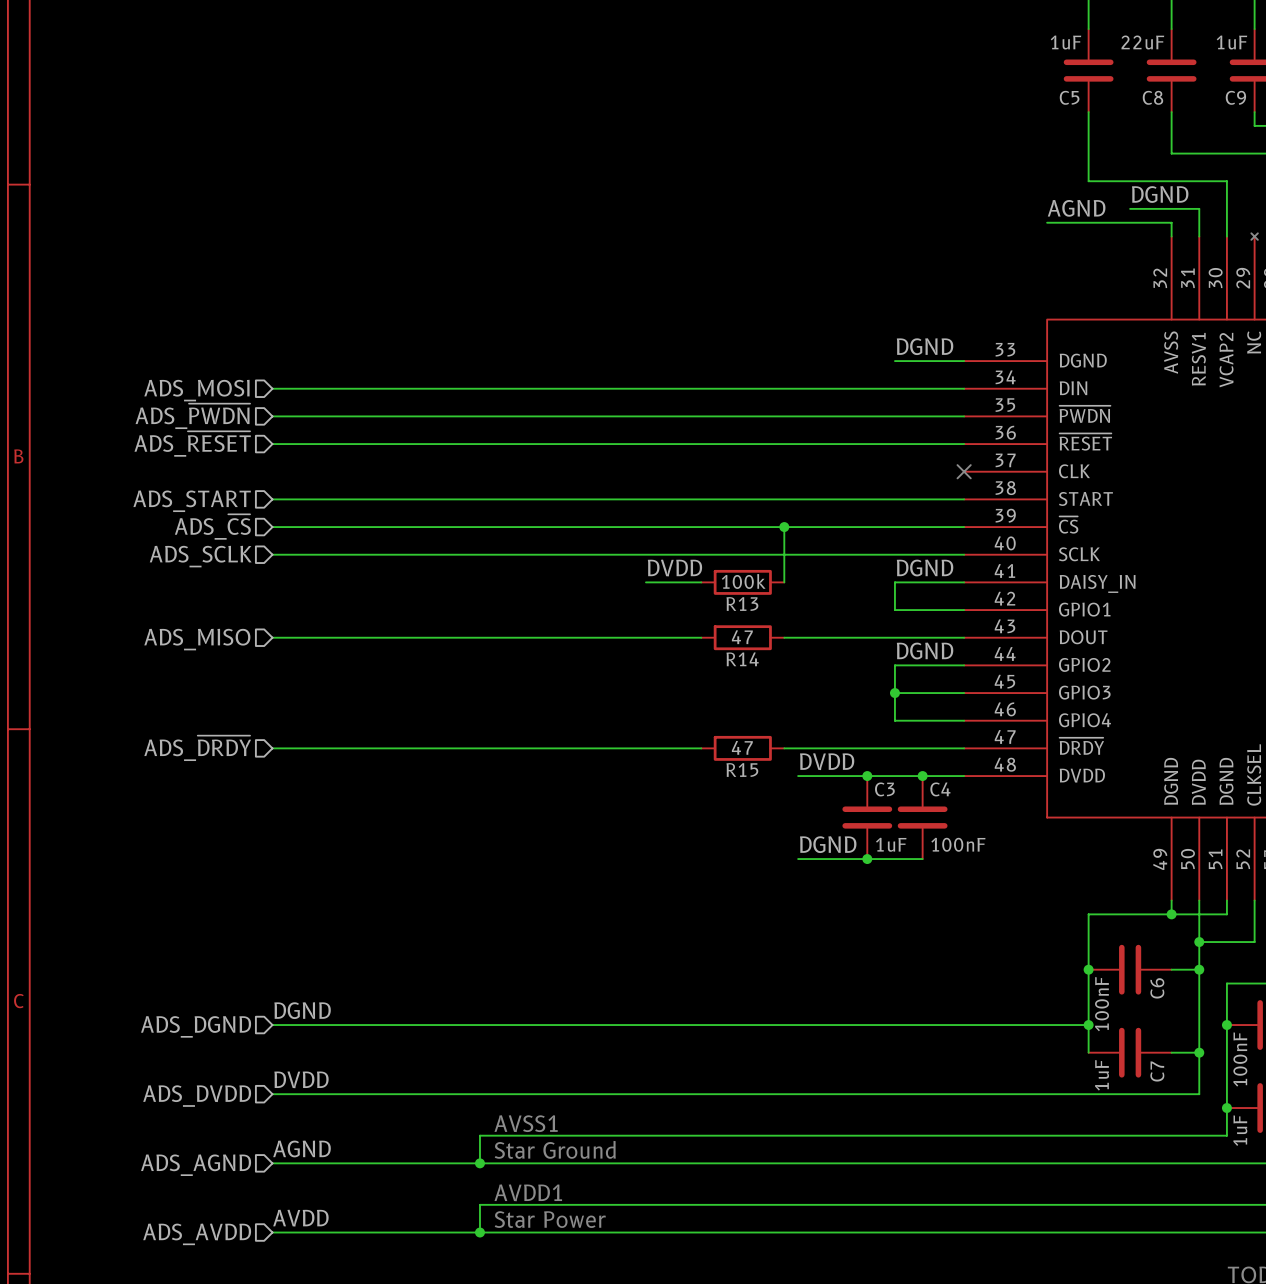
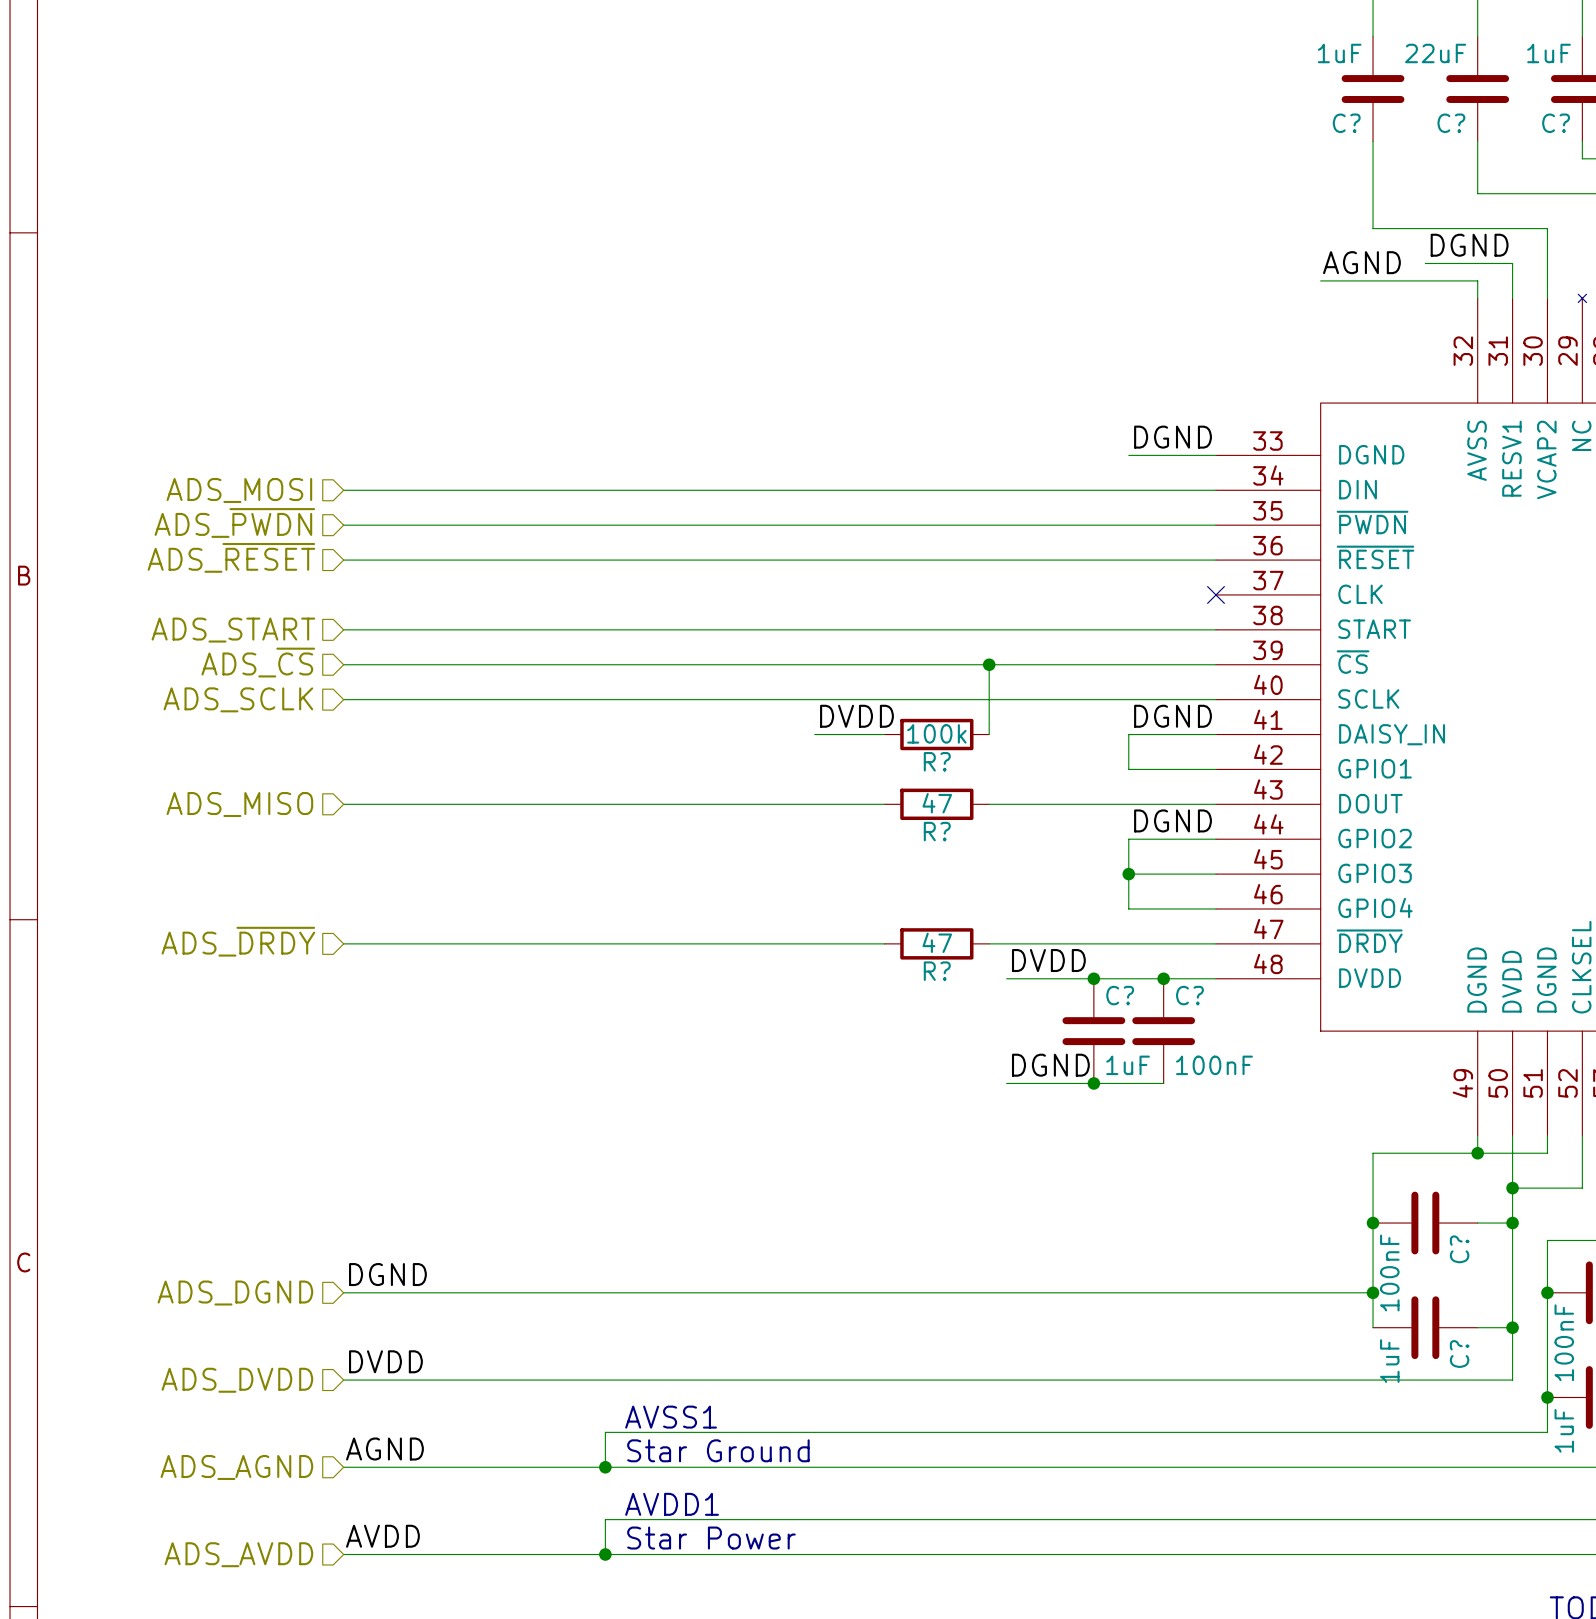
C5 name: C5 (1069, 97) -> C? (1346, 123)
C8 name: C8 (1152, 97) -> C? (1451, 123)
C9 name: C9 (1235, 97) -> C? (1556, 123)
R13 name: R13 (742, 604) -> R? (937, 761)
R14 name: R14 (742, 659) -> R? (937, 831)
R15 name: R15 (742, 769) -> R? (937, 971)
C3 name: C3 (884, 789) -> C? (1120, 995)
C4 name: C4 (940, 789) -> C? (1189, 995)
C6 name: C6 (1157, 988) -> C? (1459, 1249)
C7 name: C7 (1157, 1071) -> C? (1459, 1354)

